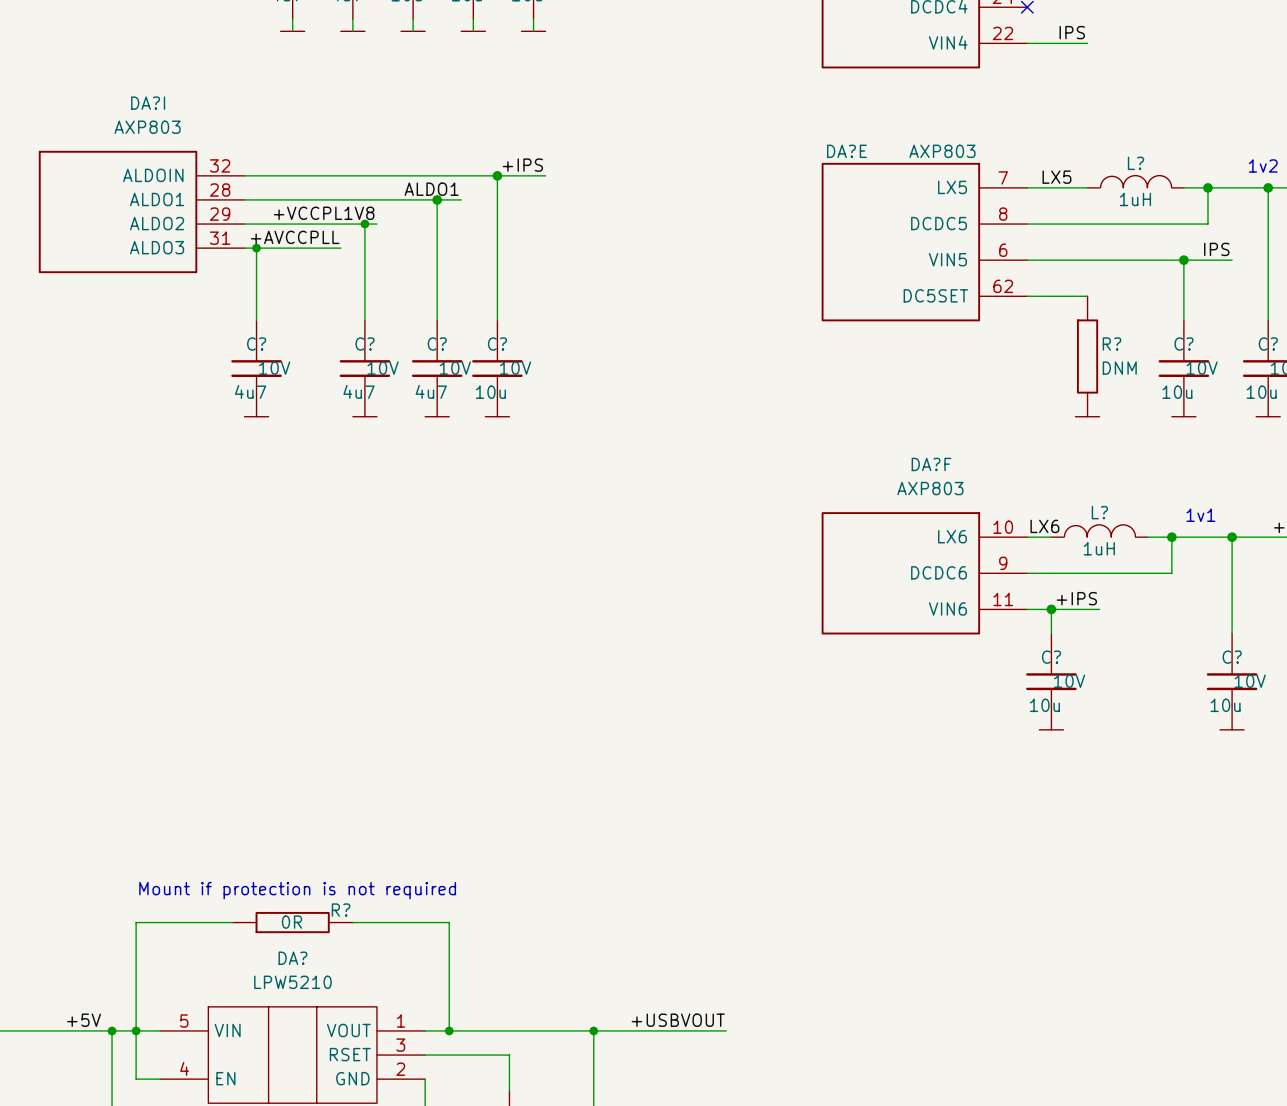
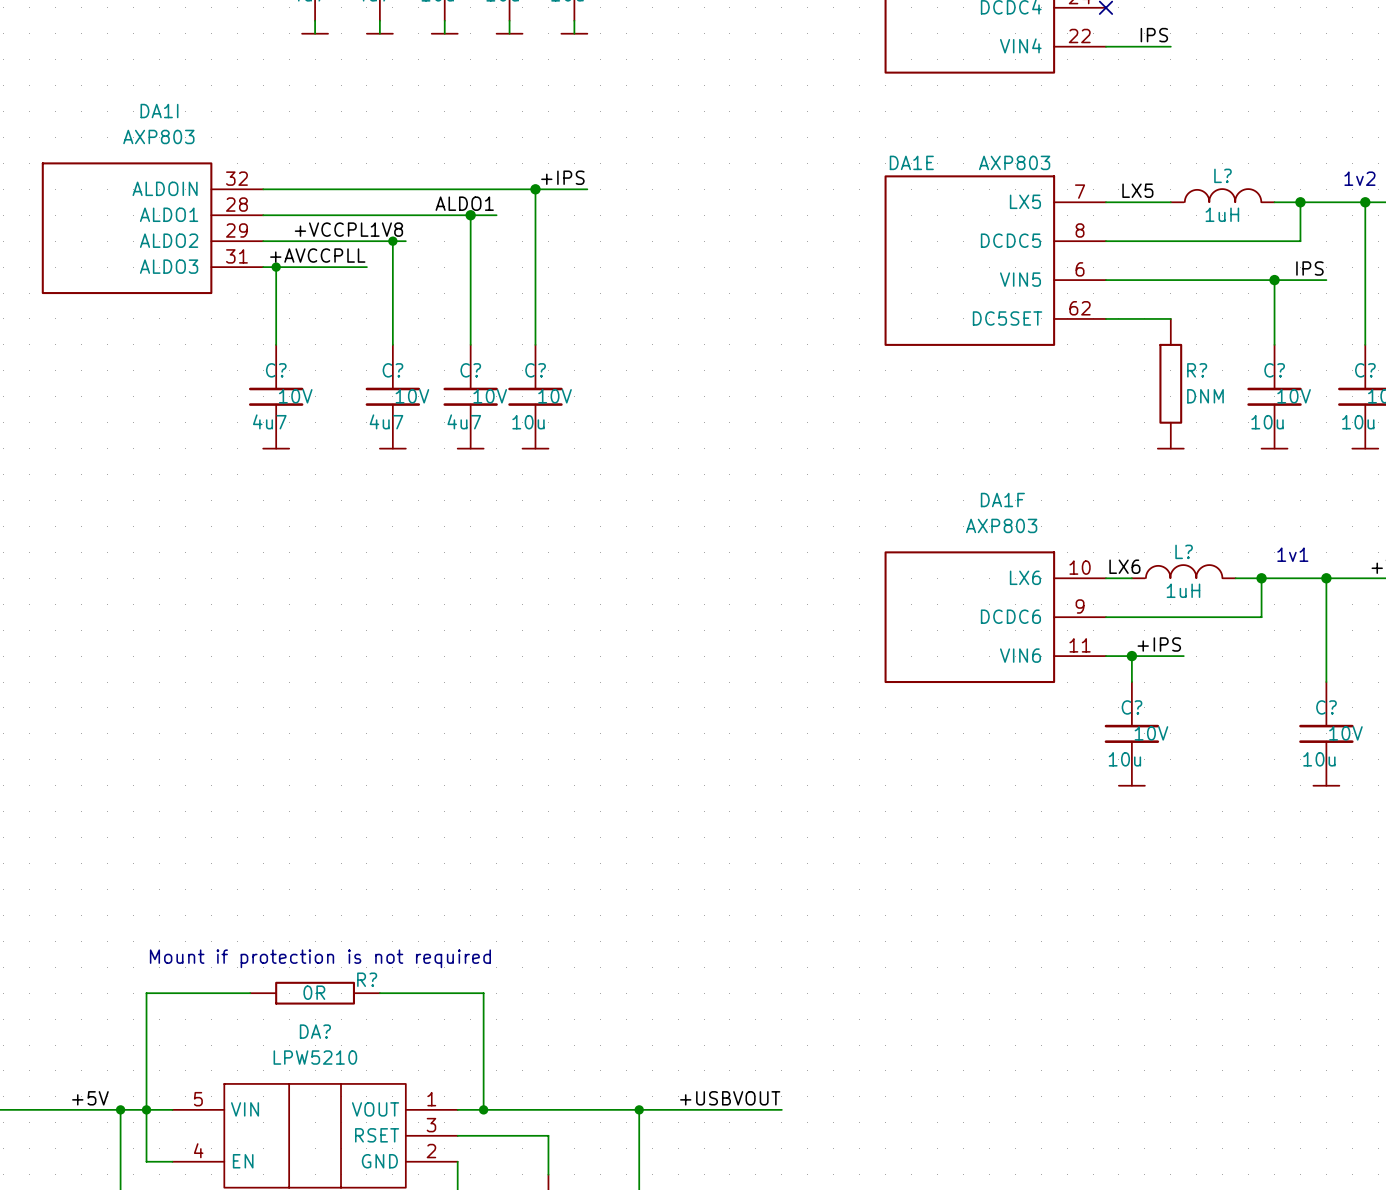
DA?I name: DA?I (148, 103) -> DA1I (159, 111)
DA?E name: DA?E (846, 151) -> DA1E (911, 162)
DA?F name: DA?F (931, 464) -> DA1F (1002, 500)

